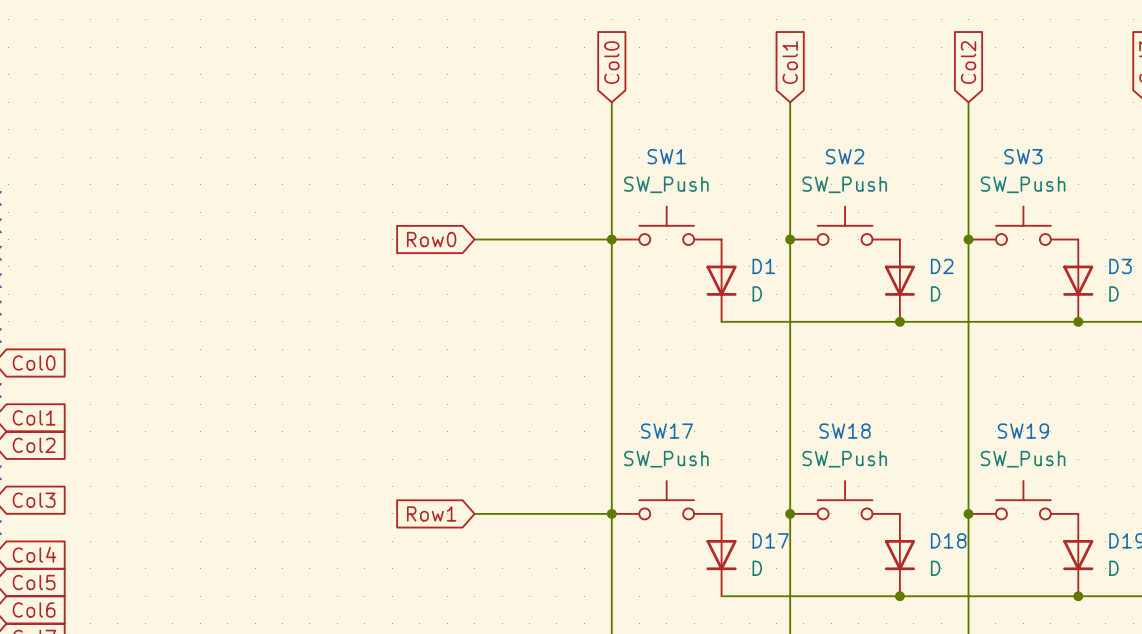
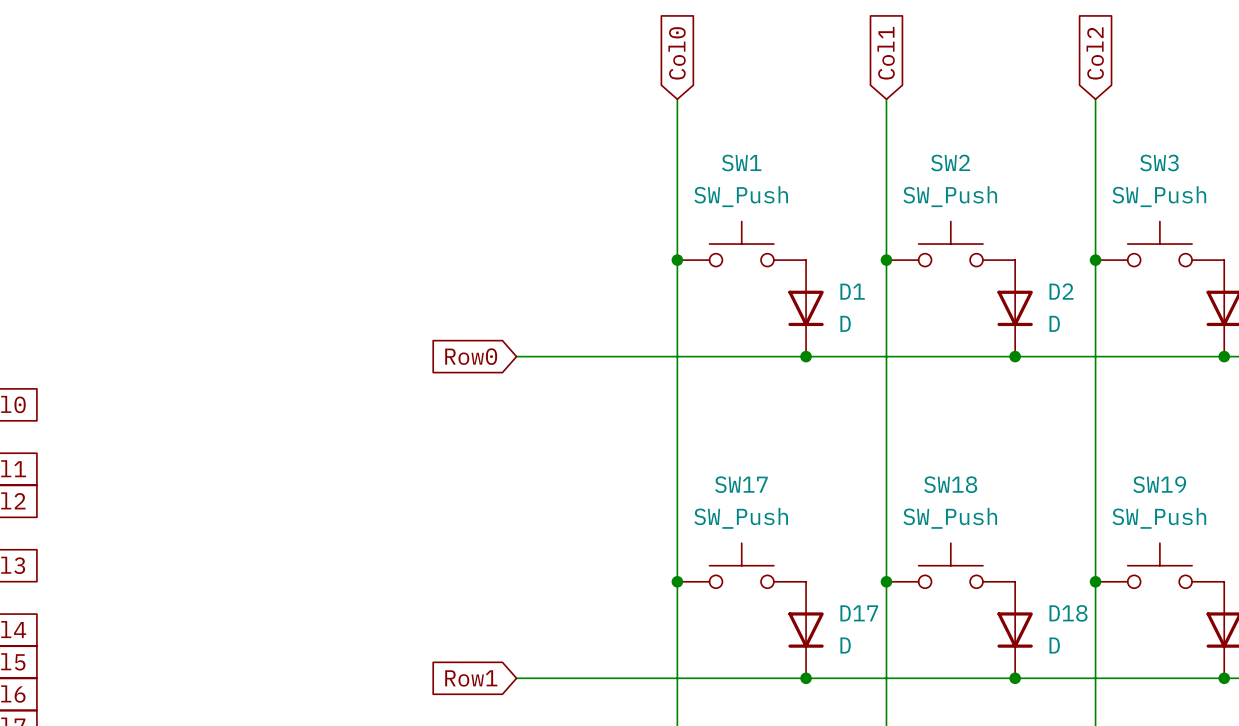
global label position: Row0 (431, 239) -> Row0 (471, 356)
wire: (474, 239) (611, 239) -> none
wire: none -> (516, 356) (806, 356)
junction: none -> (806, 356)
global label position: Row1 (431, 513) -> Row1 (471, 678)
wire: (474, 513) (611, 513) -> none
wire: none -> (516, 678) (806, 678)
junction: none -> (806, 678)

